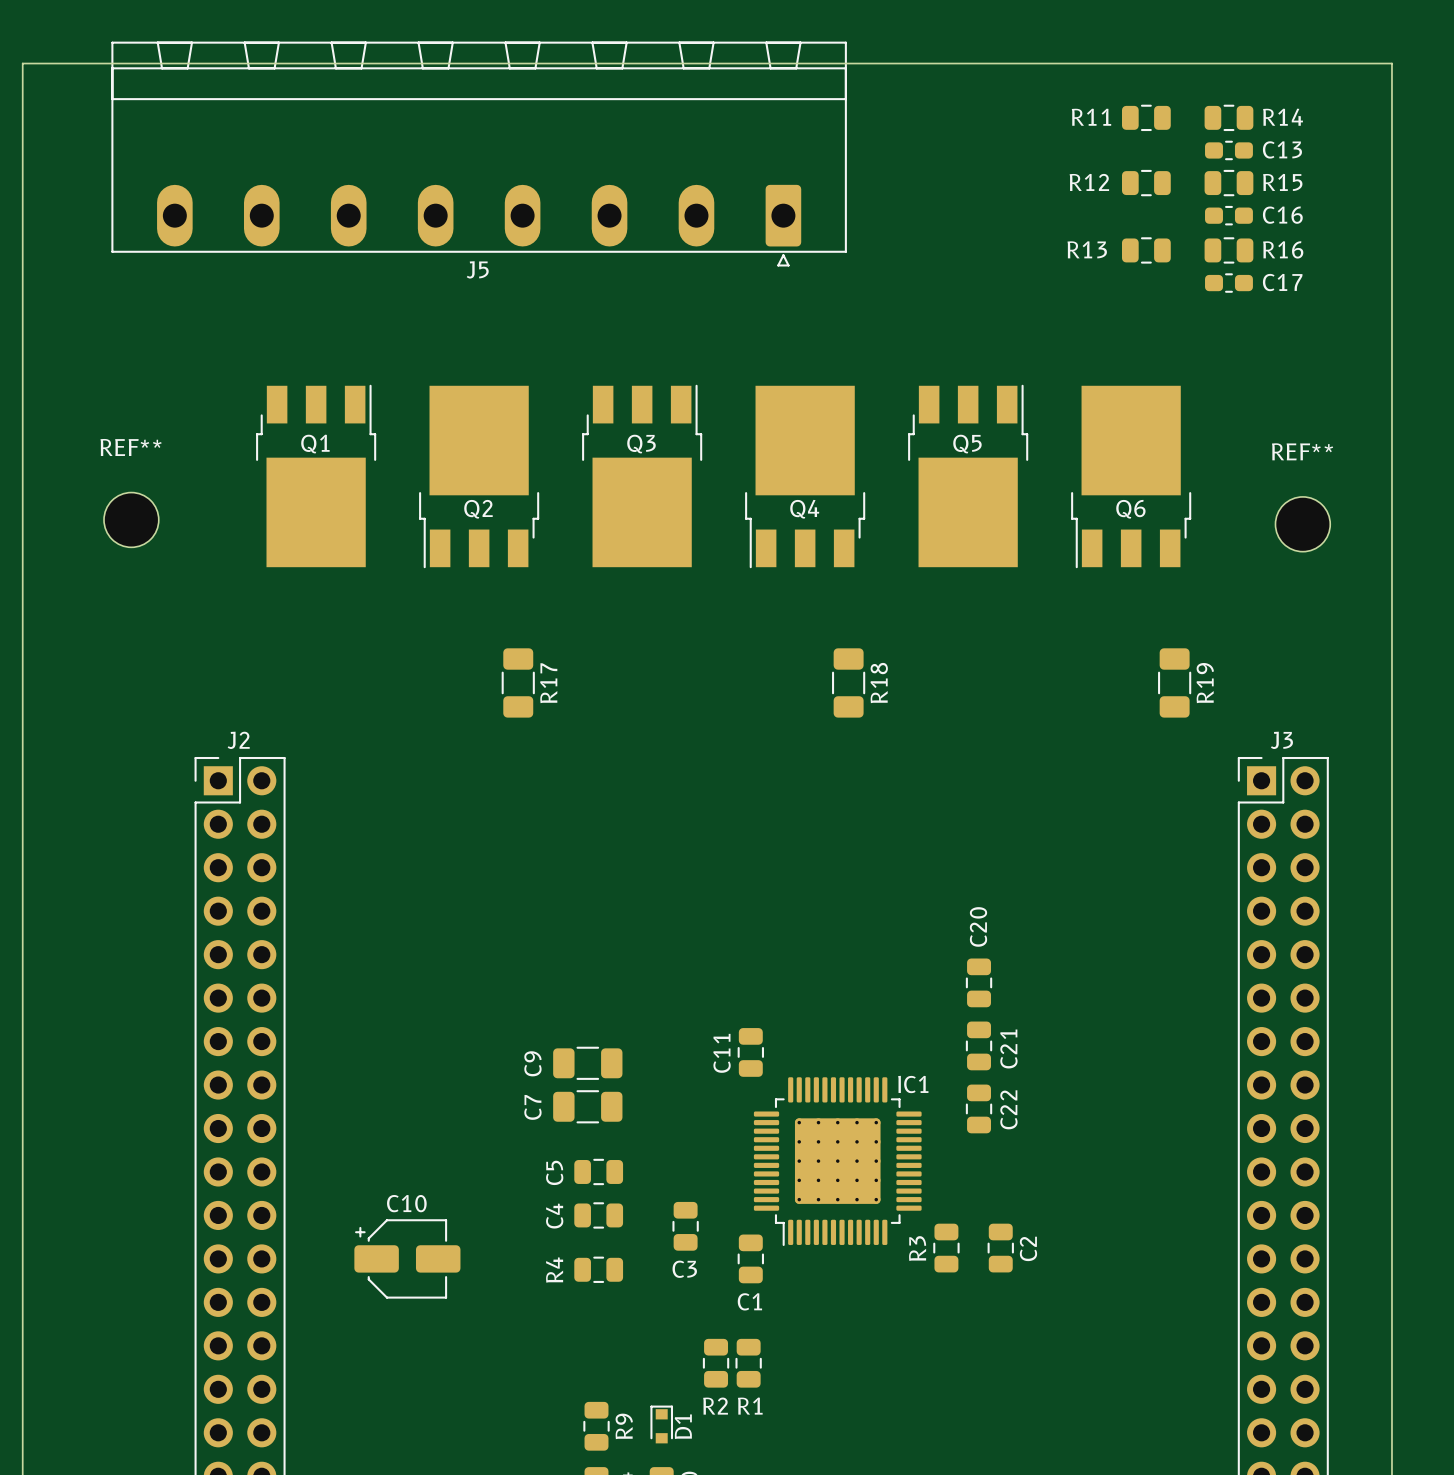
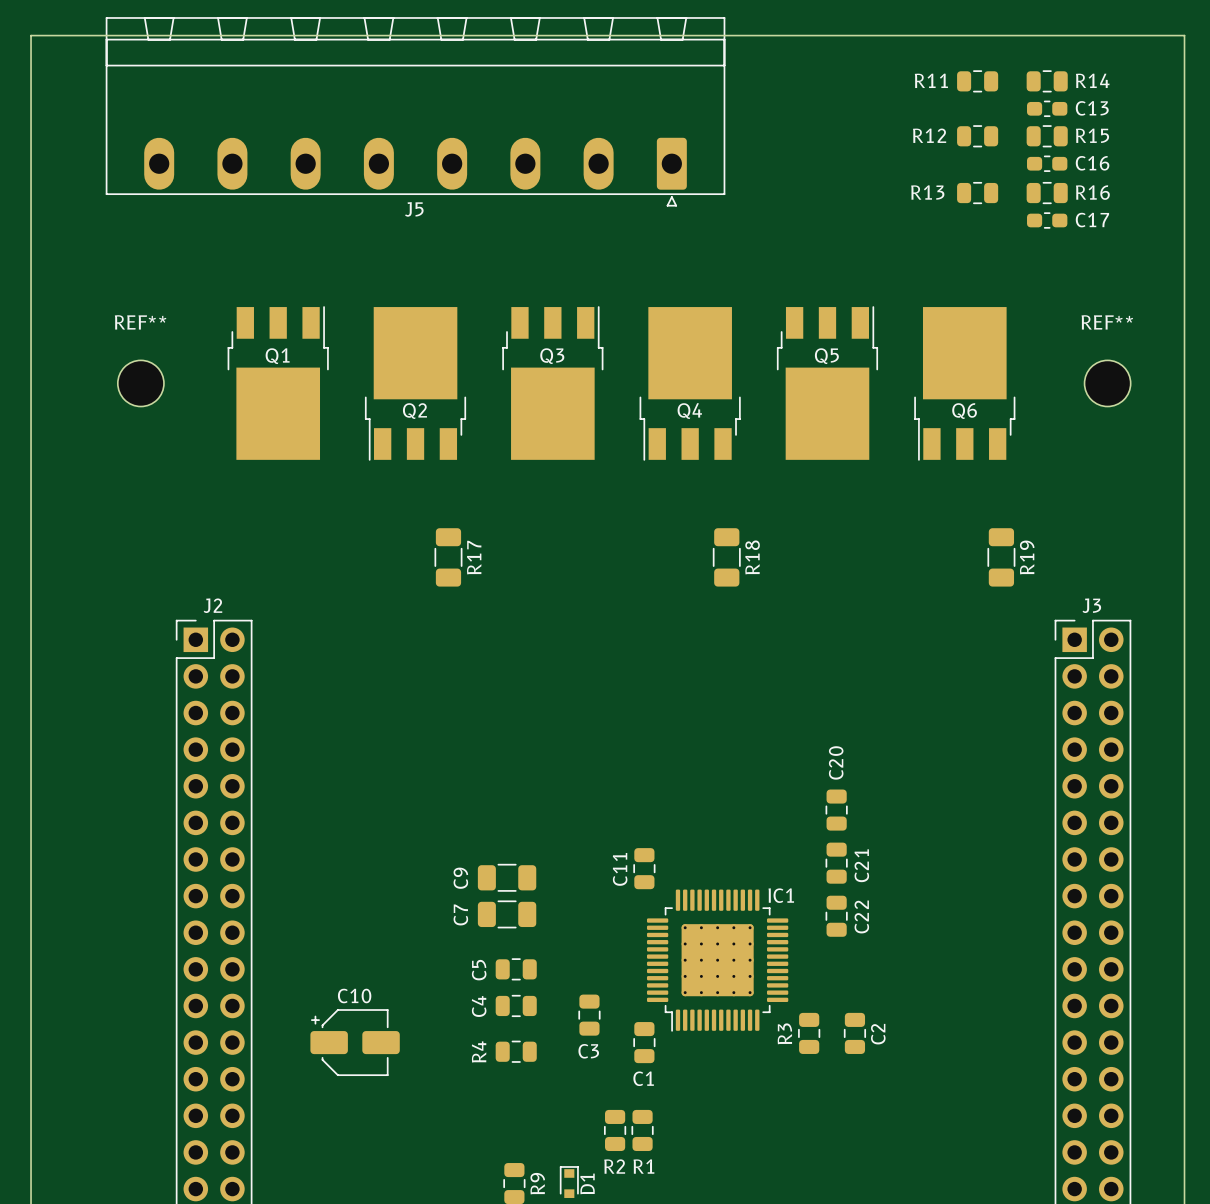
REF** position: (131, 519) -> (140, 383)
REF** position: (1302, 524) -> (1107, 383)

